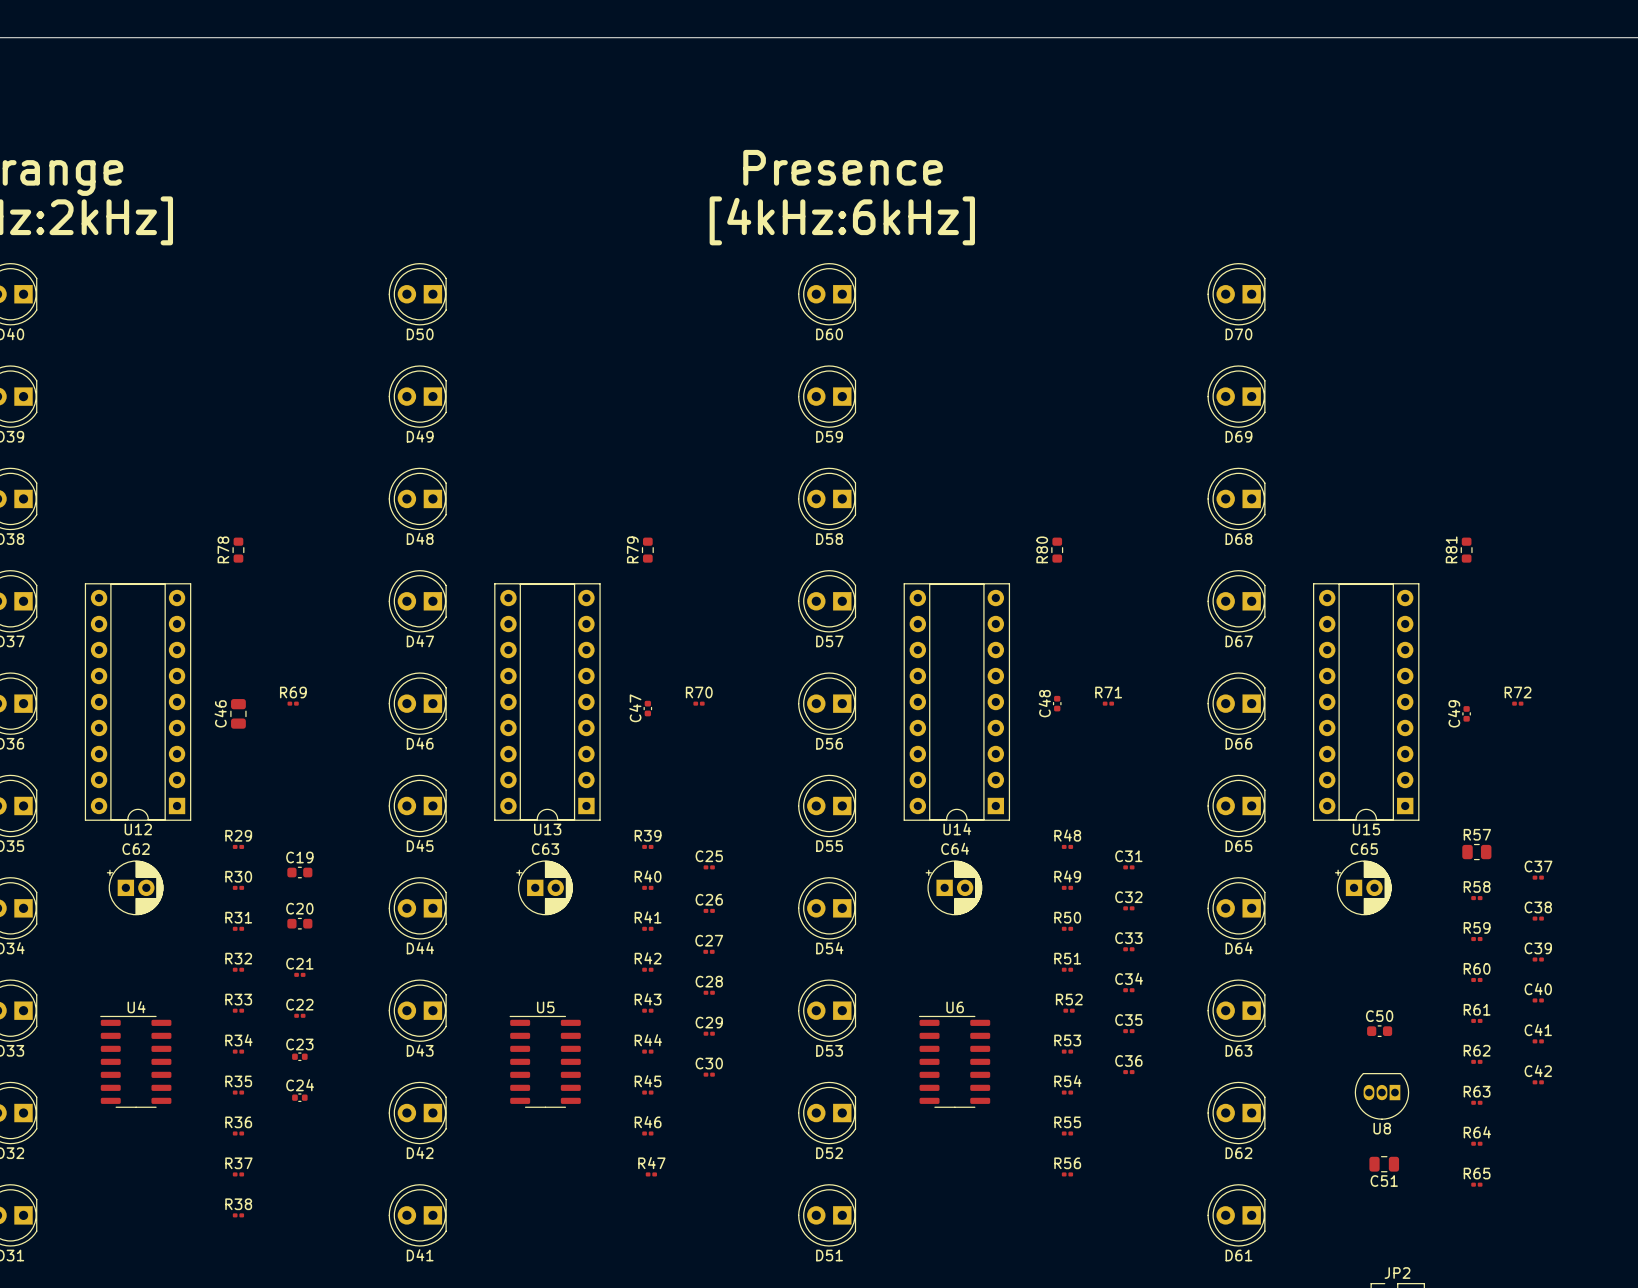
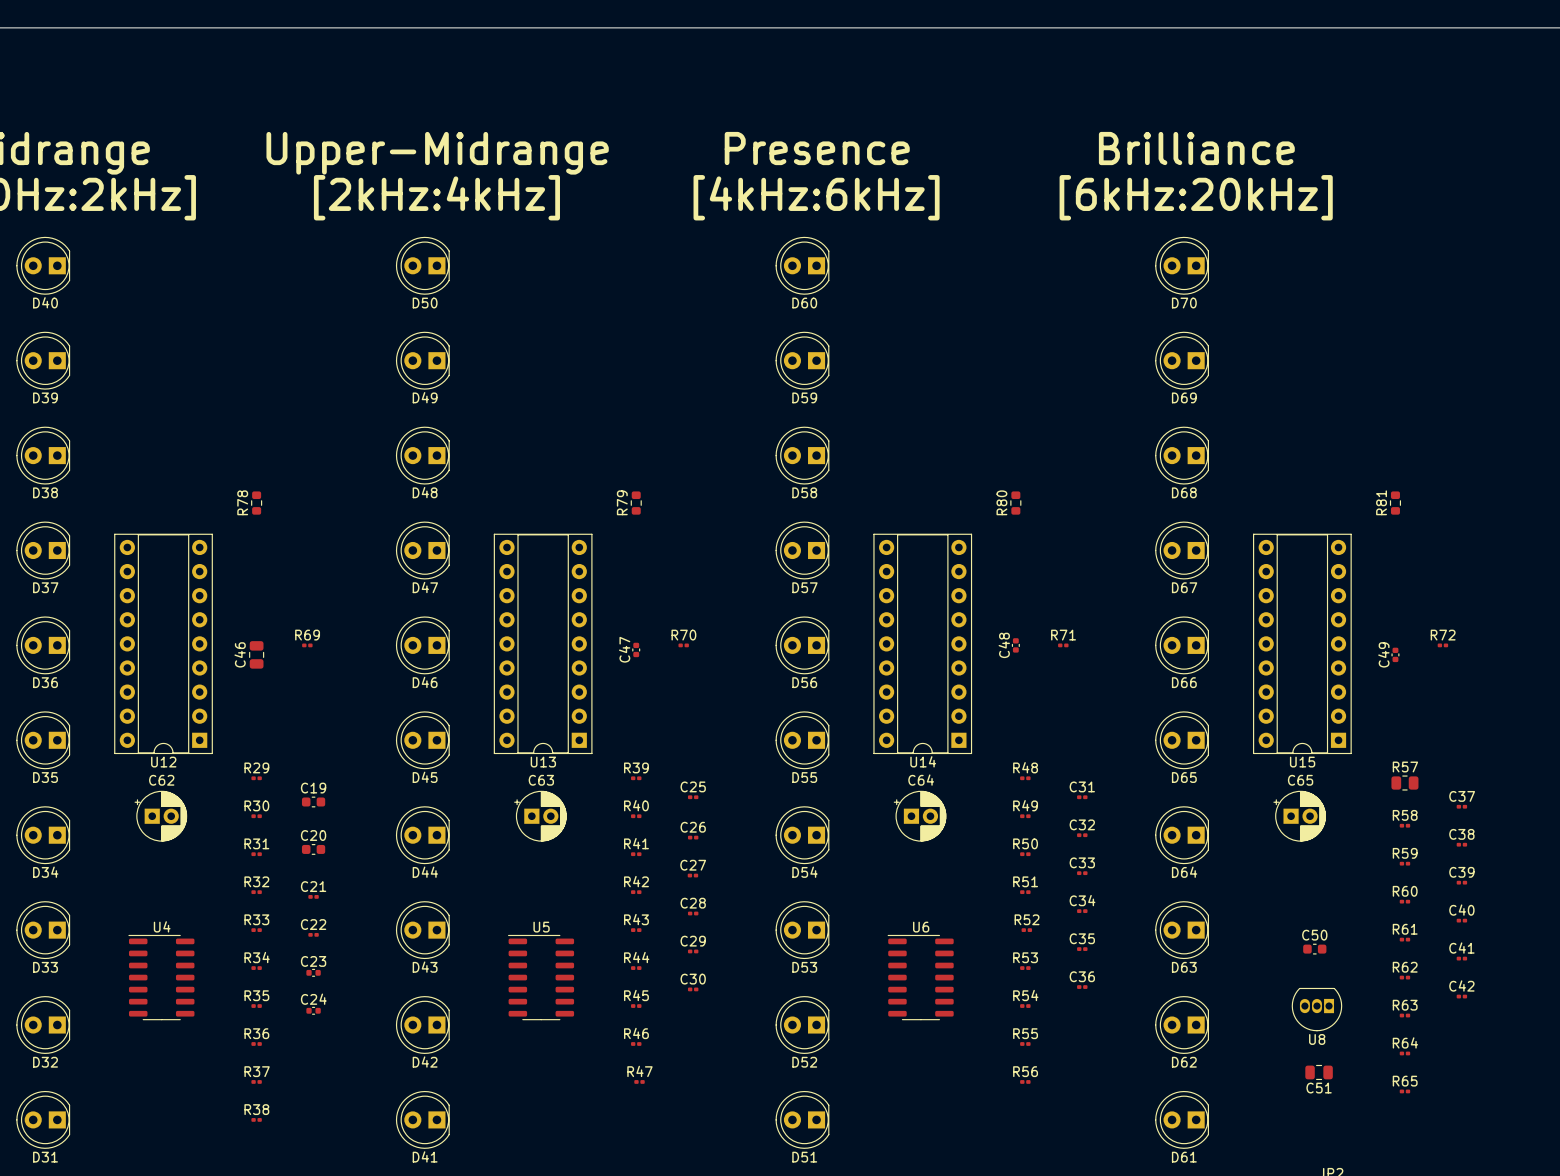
text: none -> Brilliance (1196, 148)
text: none -> Upper-Midrange (437, 153)
text: none -> [2kHz:4kHz] (436, 197)
text: none -> [6kHz:20kHz] (1196, 197)

